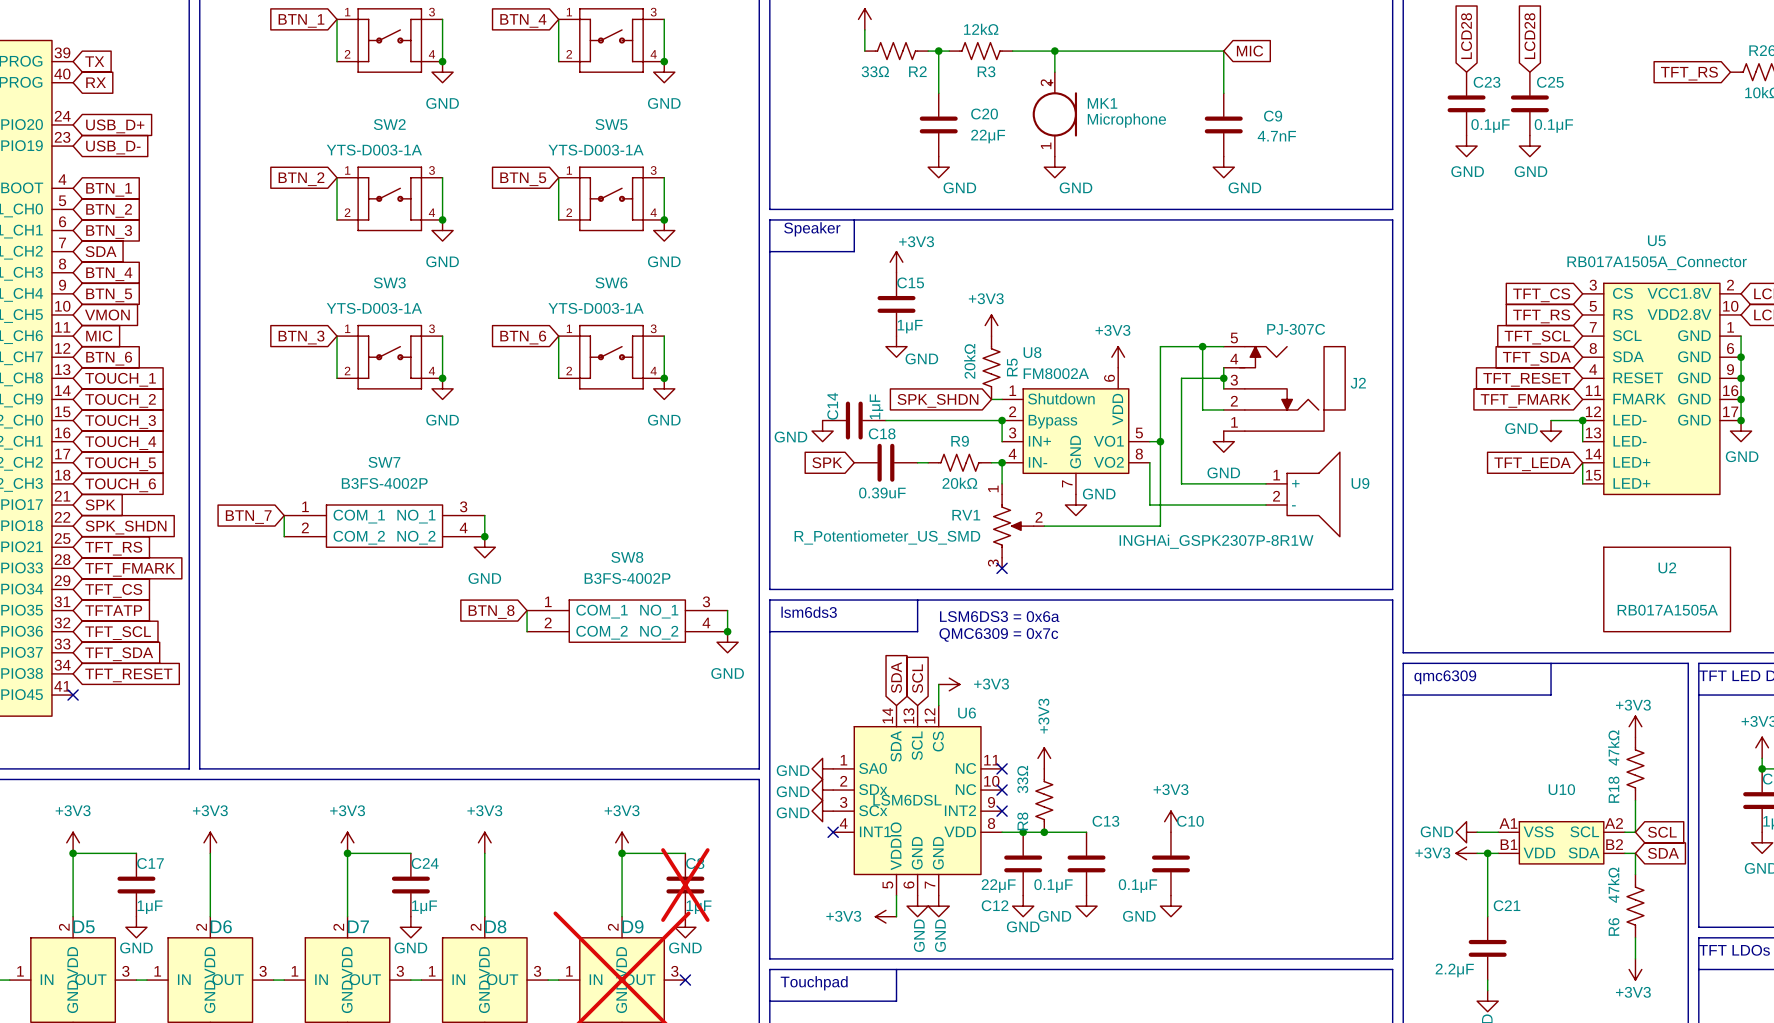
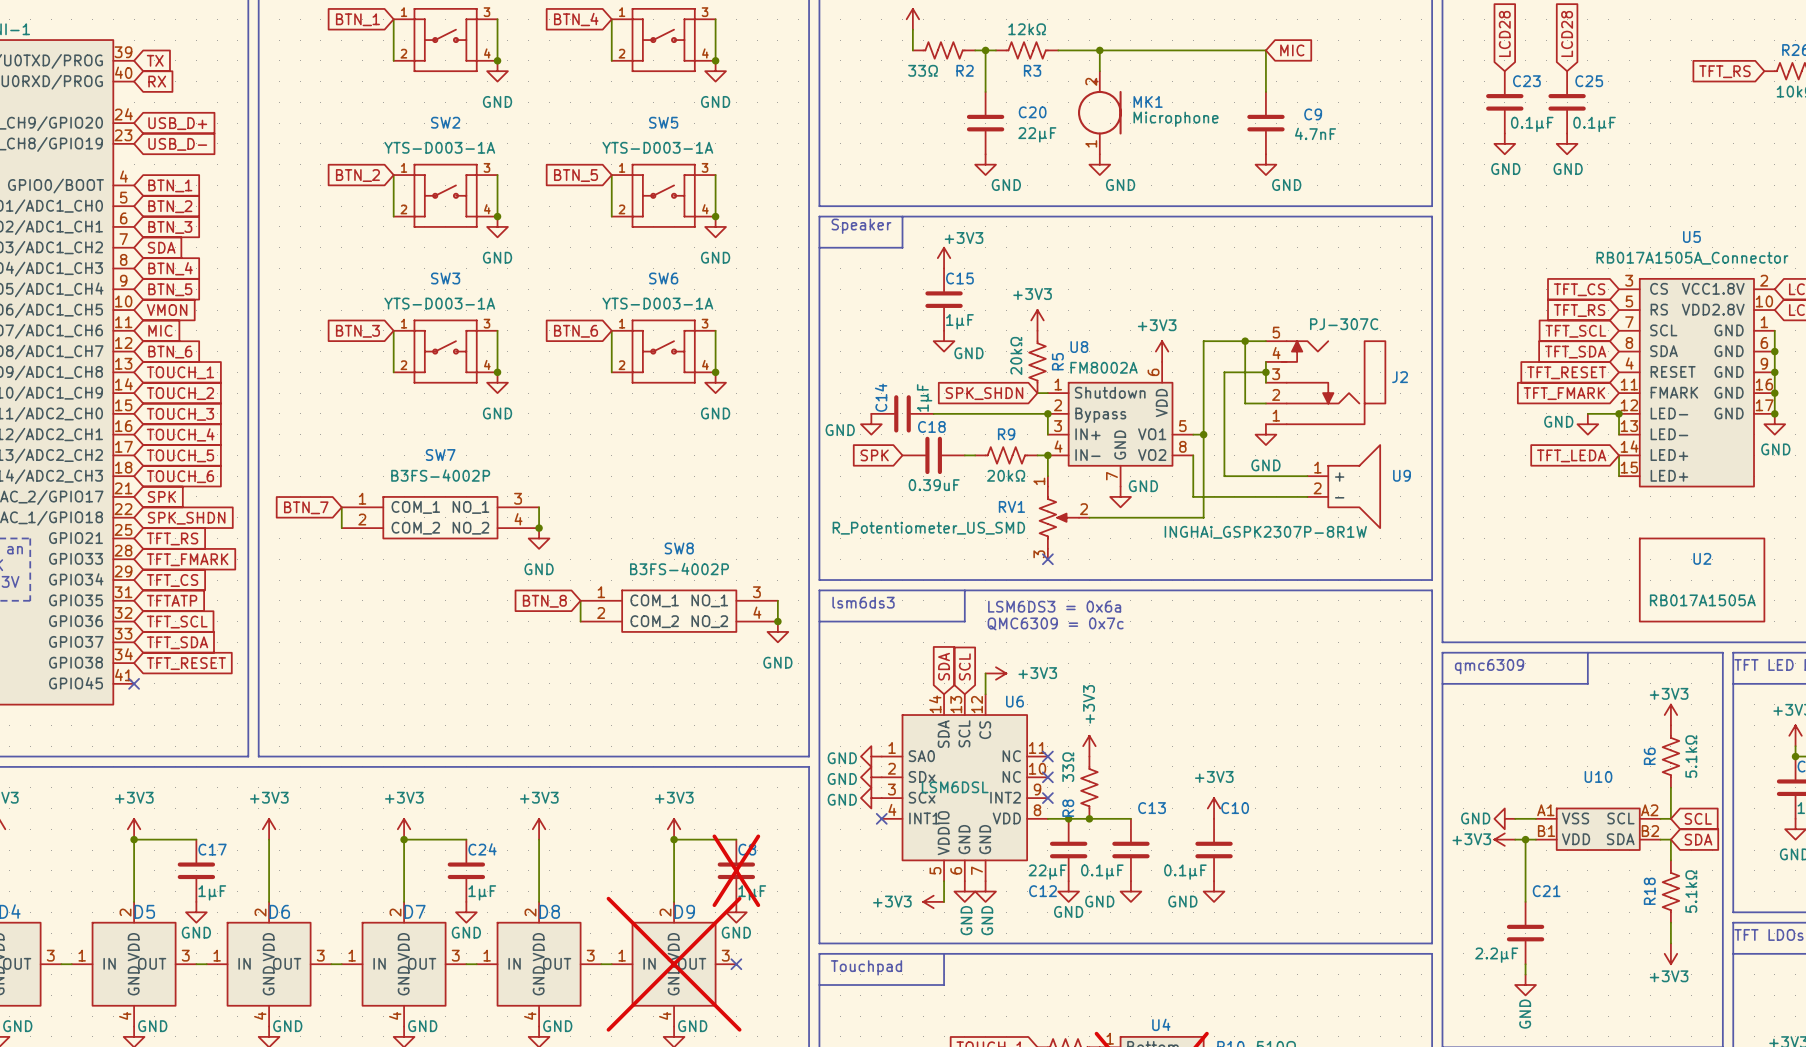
R18 value: 47kΩ (1613, 747) -> 5.1kΩ (1691, 756)
R18 name: R18 (1613, 789) -> R6 (1649, 756)
R6 value: 47kΩ (1613, 885) -> 5.1kΩ (1691, 891)
R6 name: R6 (1613, 926) -> R18 (1649, 891)

